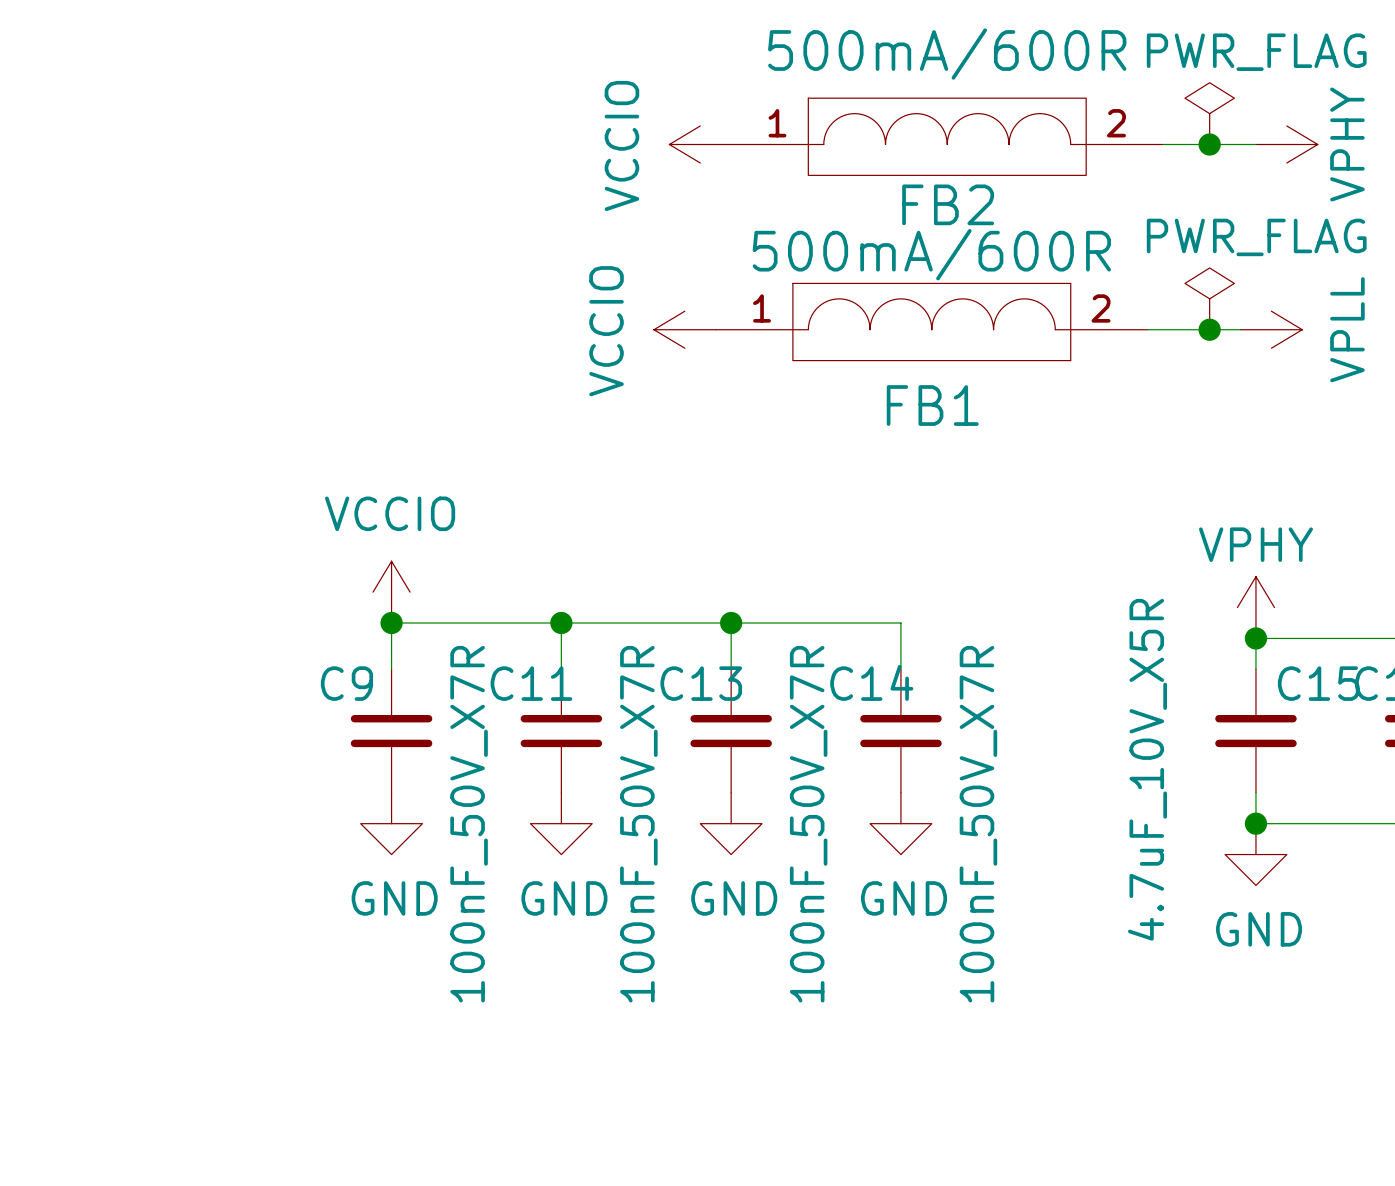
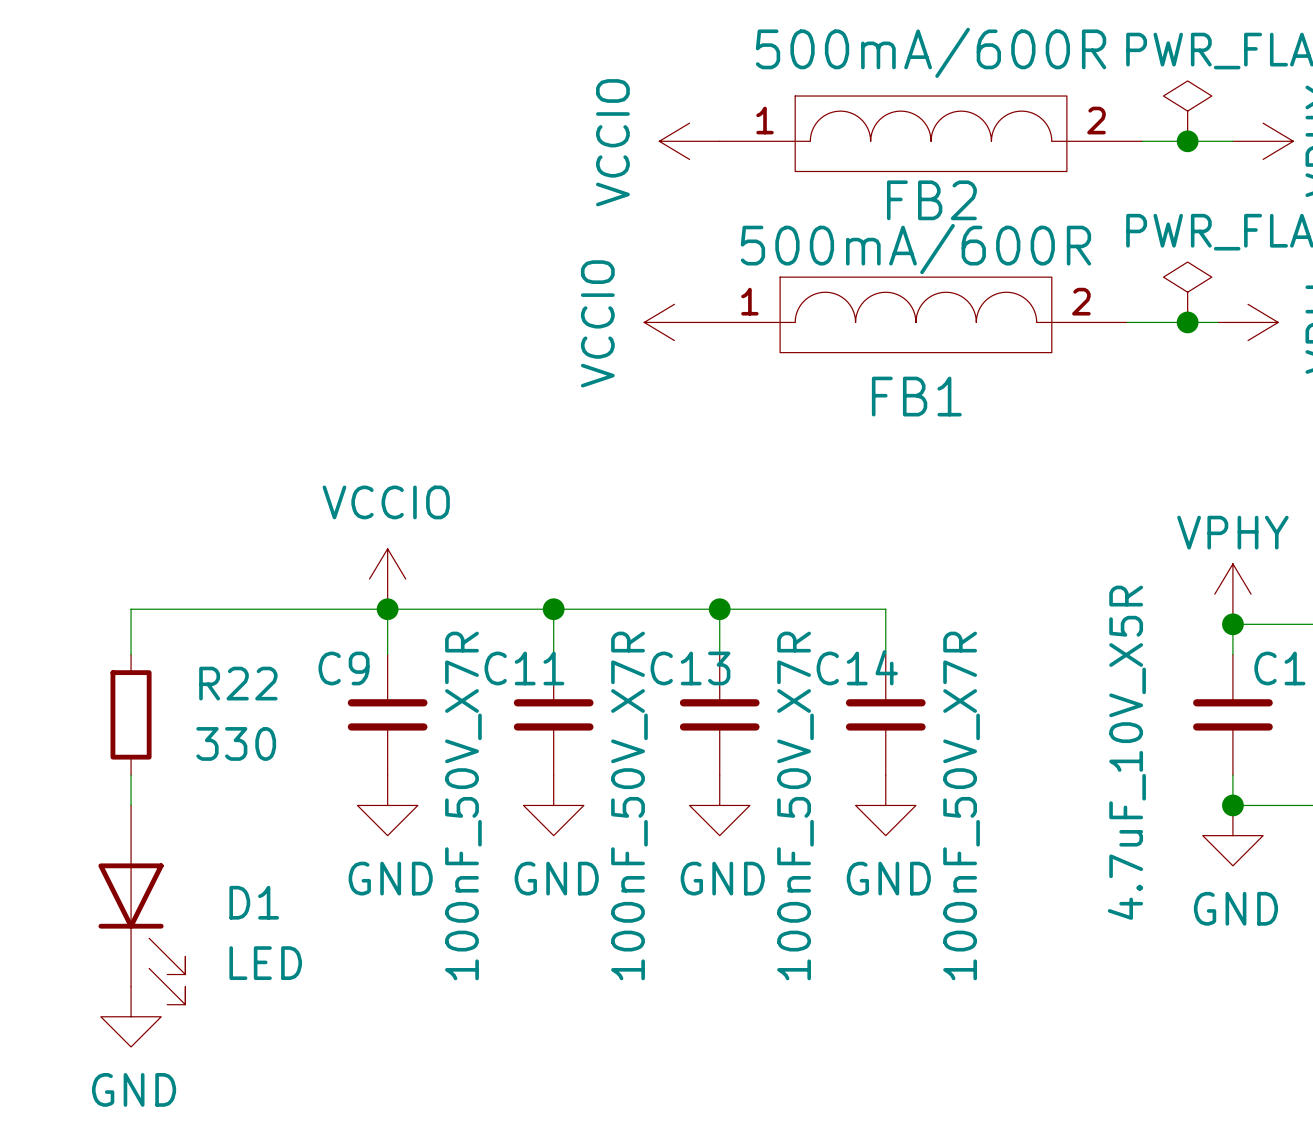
wire: none -> (387, 609) (131, 609) (131, 654)
R22: none -> 330 (131, 714)
wire: none -> (131, 775) (131, 805)
D1: none -> LED (141, 905)
power symbol: none -> GND (131, 1016)

